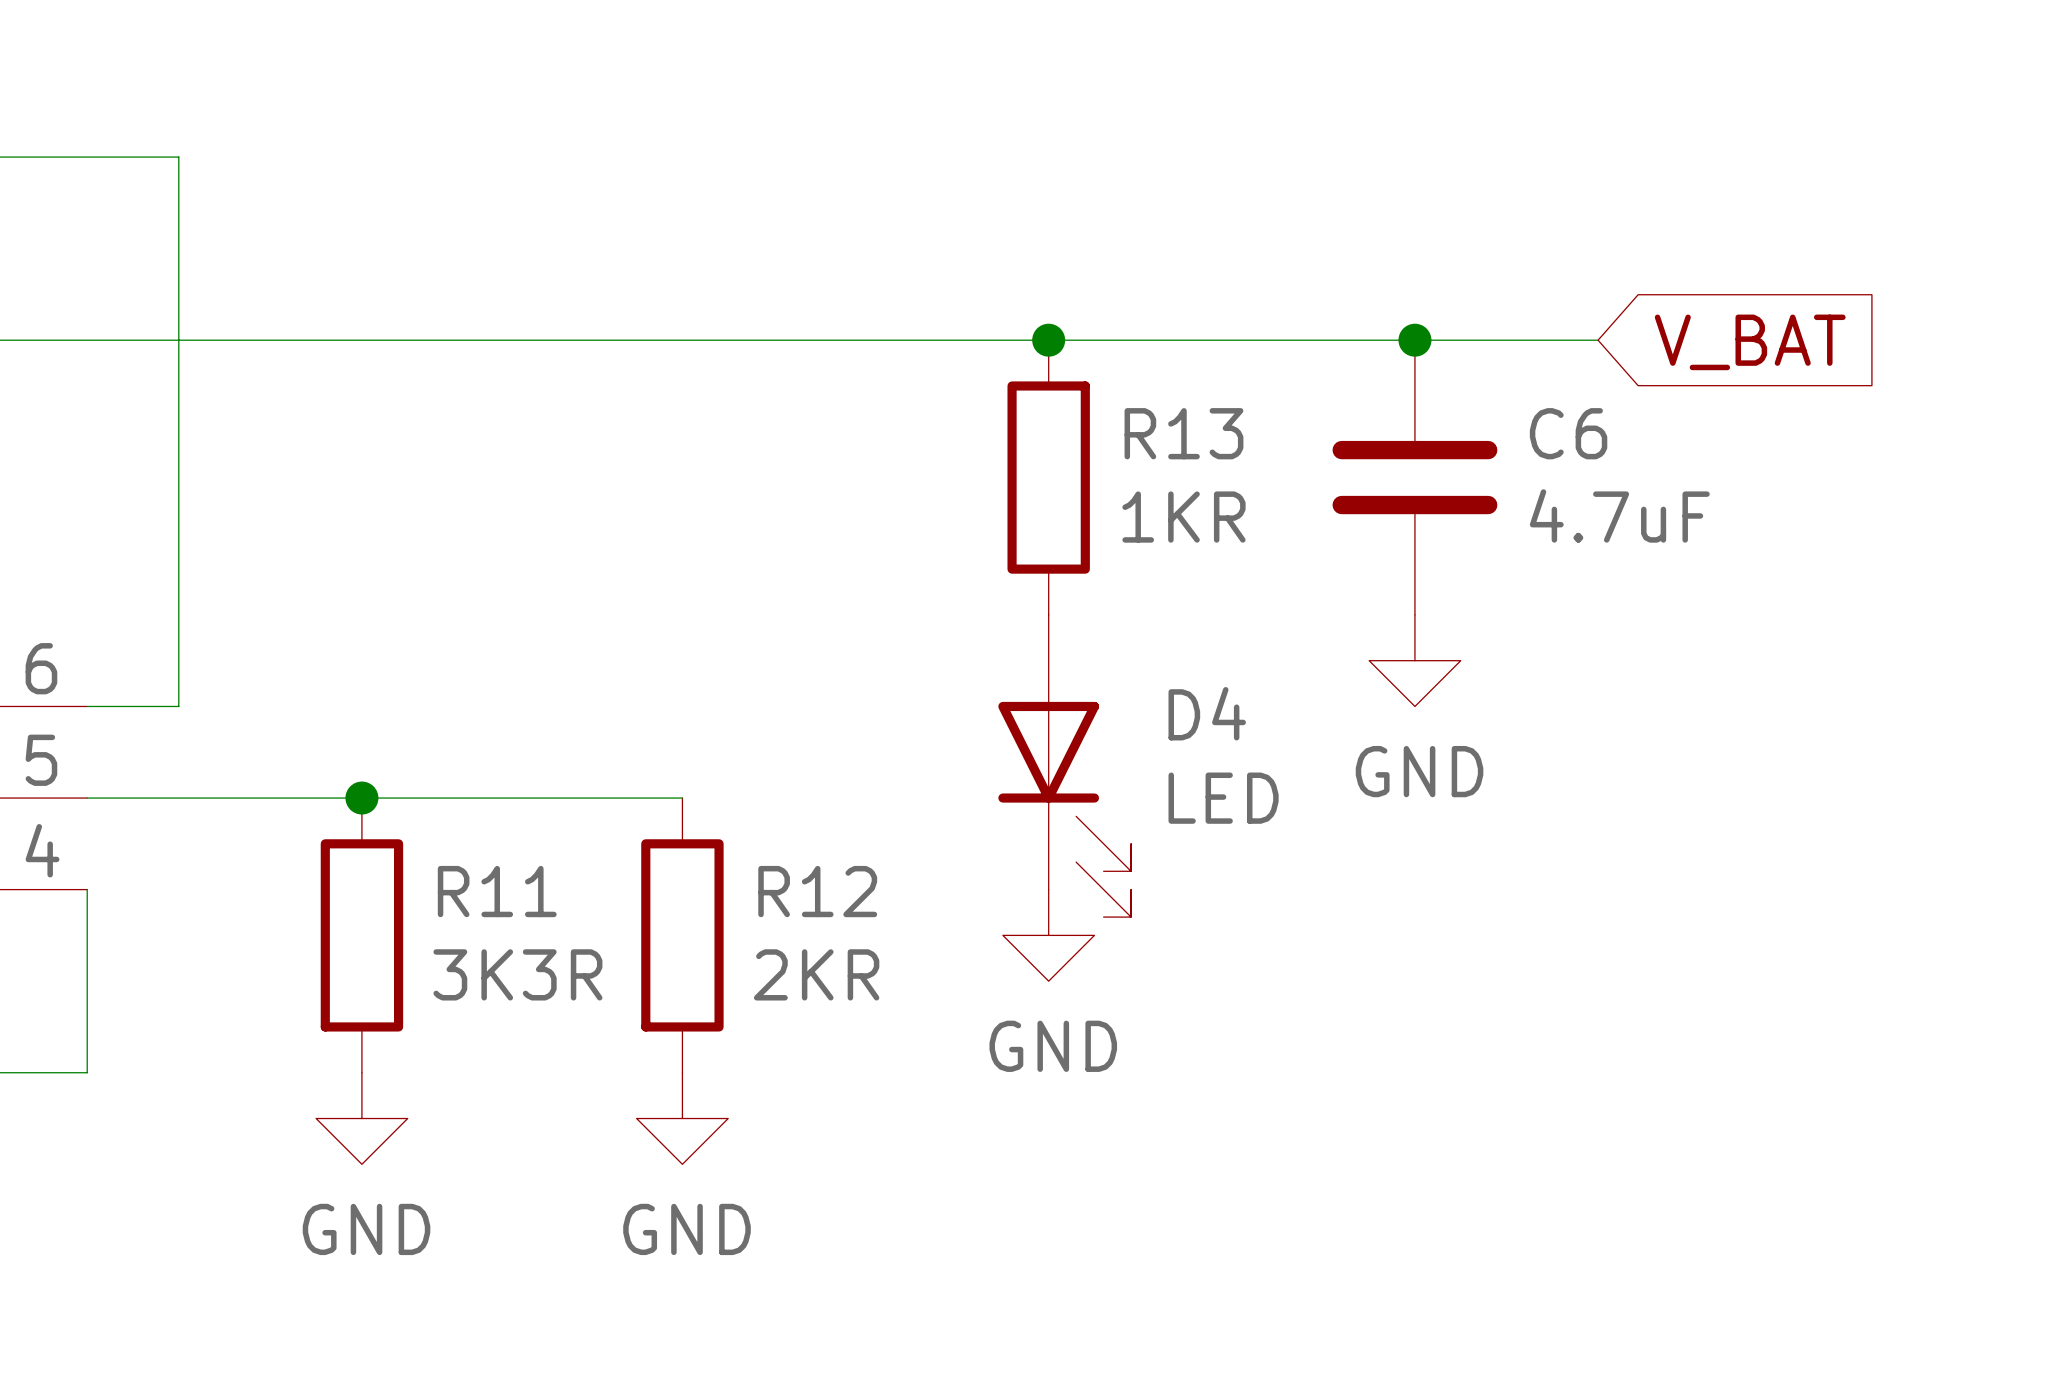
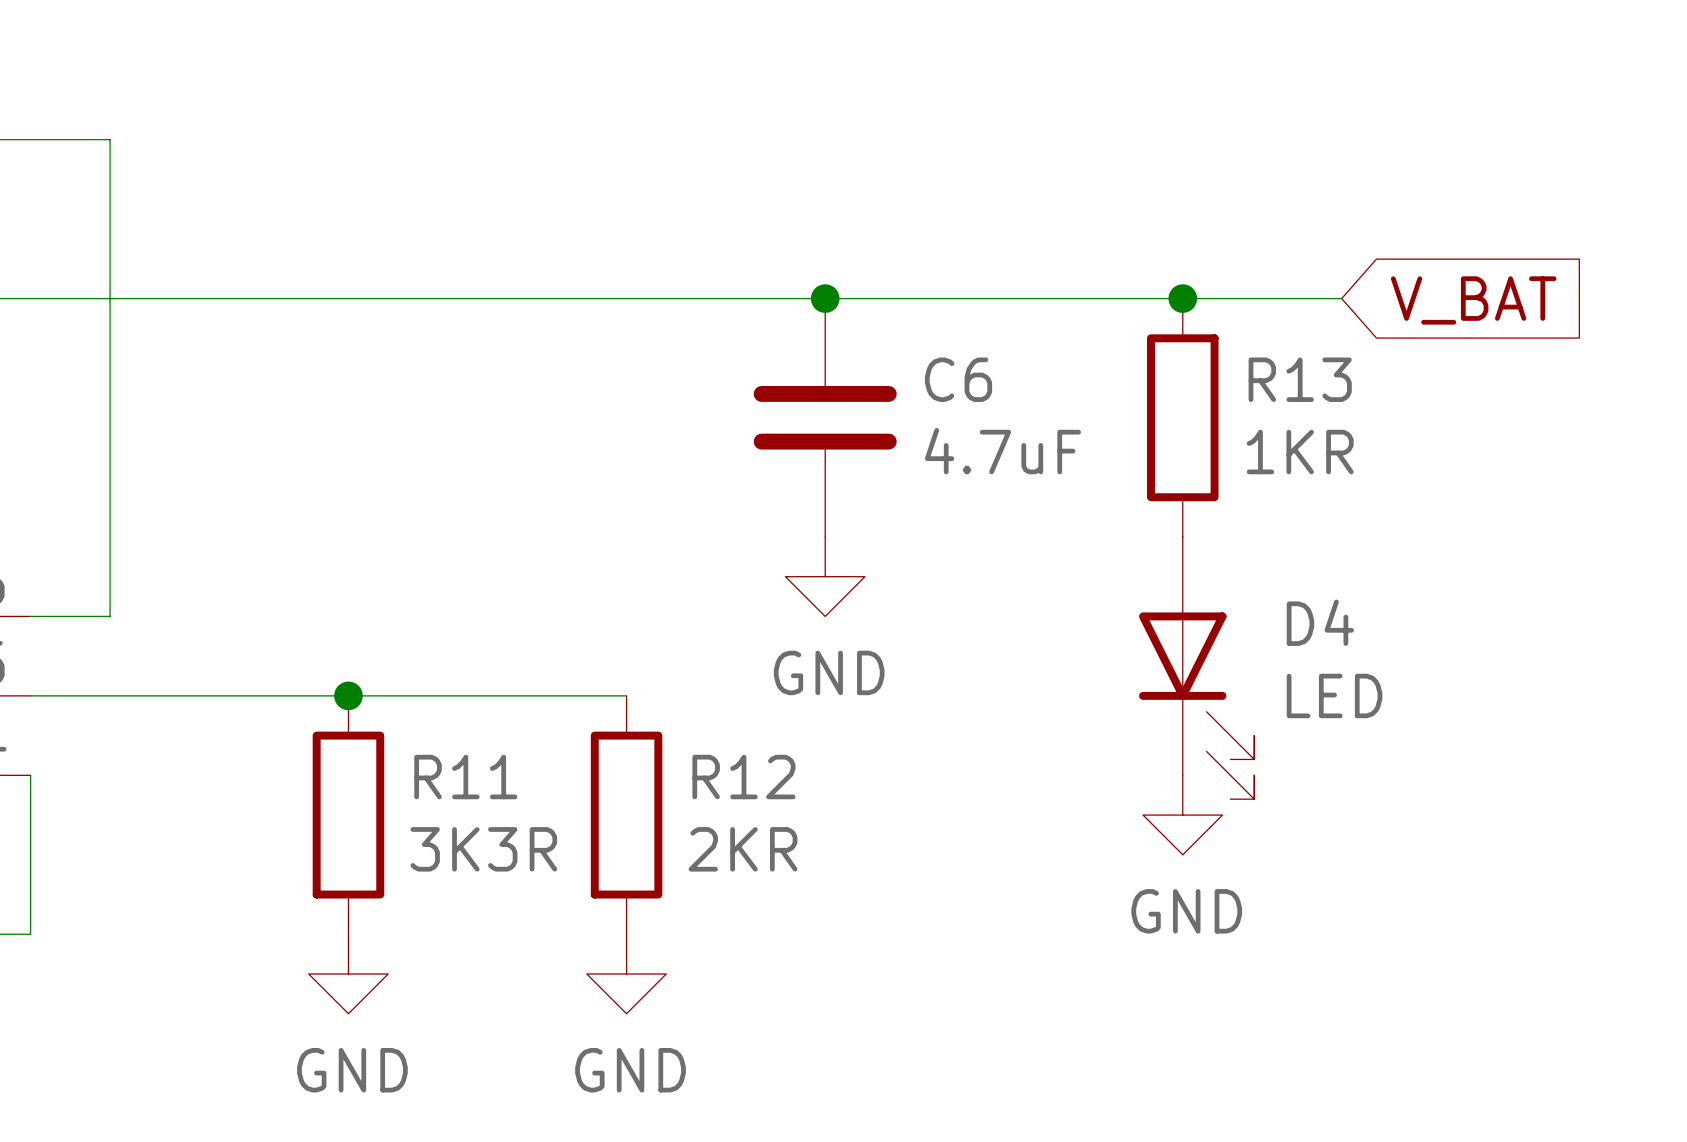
junction position: (1048, 340) -> (825, 298)
R13 position: (1048, 477) -> (1182, 417)
C6 position: (1414, 477) -> (825, 417)
power symbol: none -> GND (825, 576)
power symbol: GND (1414, 660) -> none
D4 position: (1064, 765) -> (1196, 668)
junction position: (361, 798) -> (348, 695)
wire: none -> (547, 695) (626, 695)
R11 position: (361, 935) -> (348, 815)
R12 position: (682, 935) -> (626, 815)
power symbol: GND (1048, 935) -> none
power symbol: none -> GND (1182, 815)
power symbol position: GND (361, 1118) -> GND (348, 973)
power symbol position: GND (682, 1118) -> GND (626, 973)

